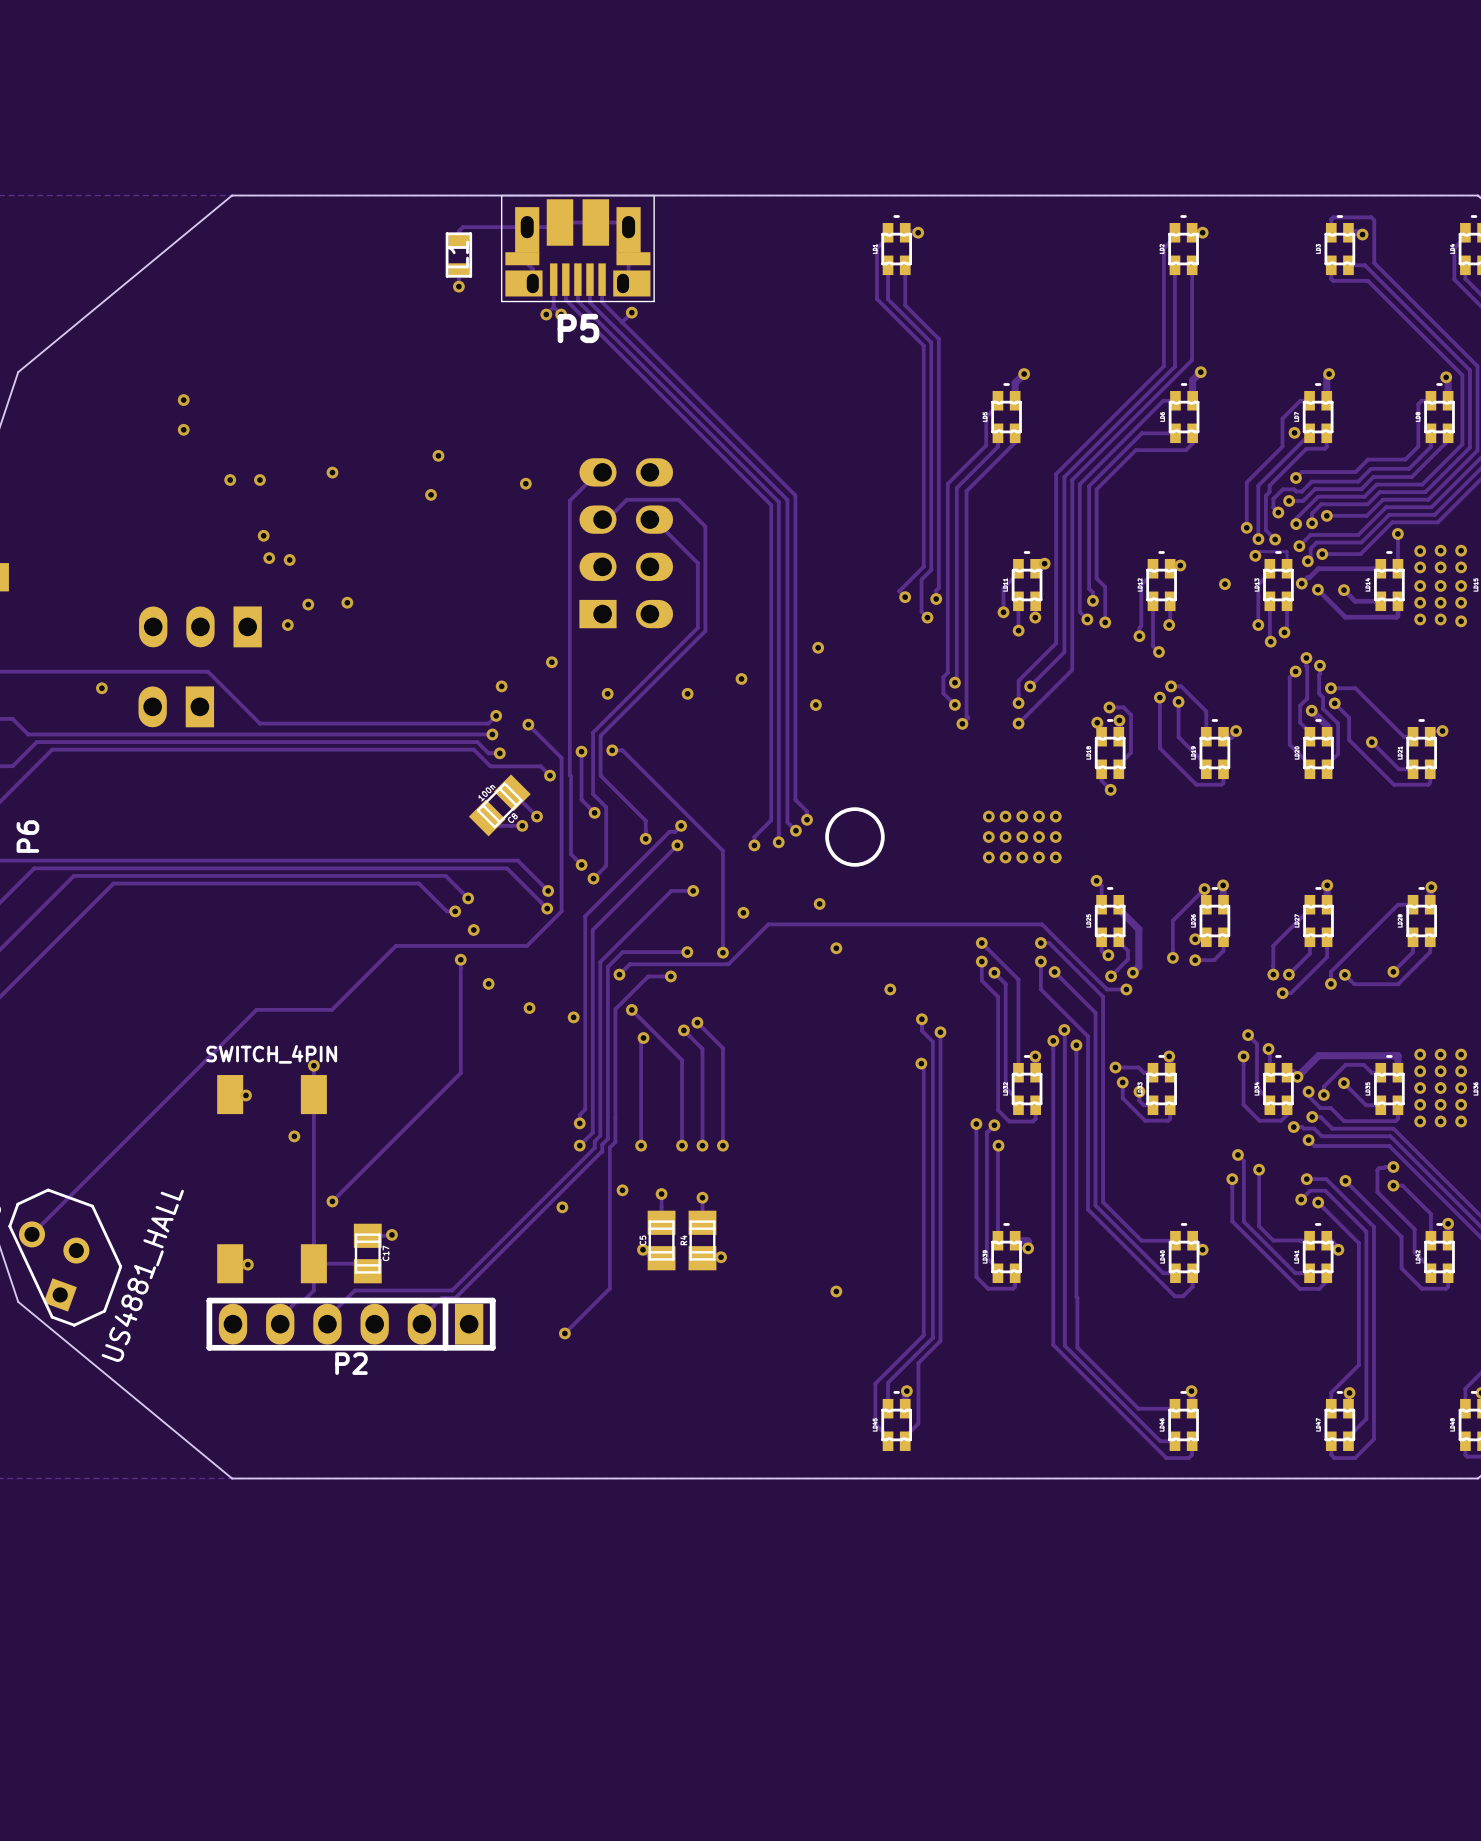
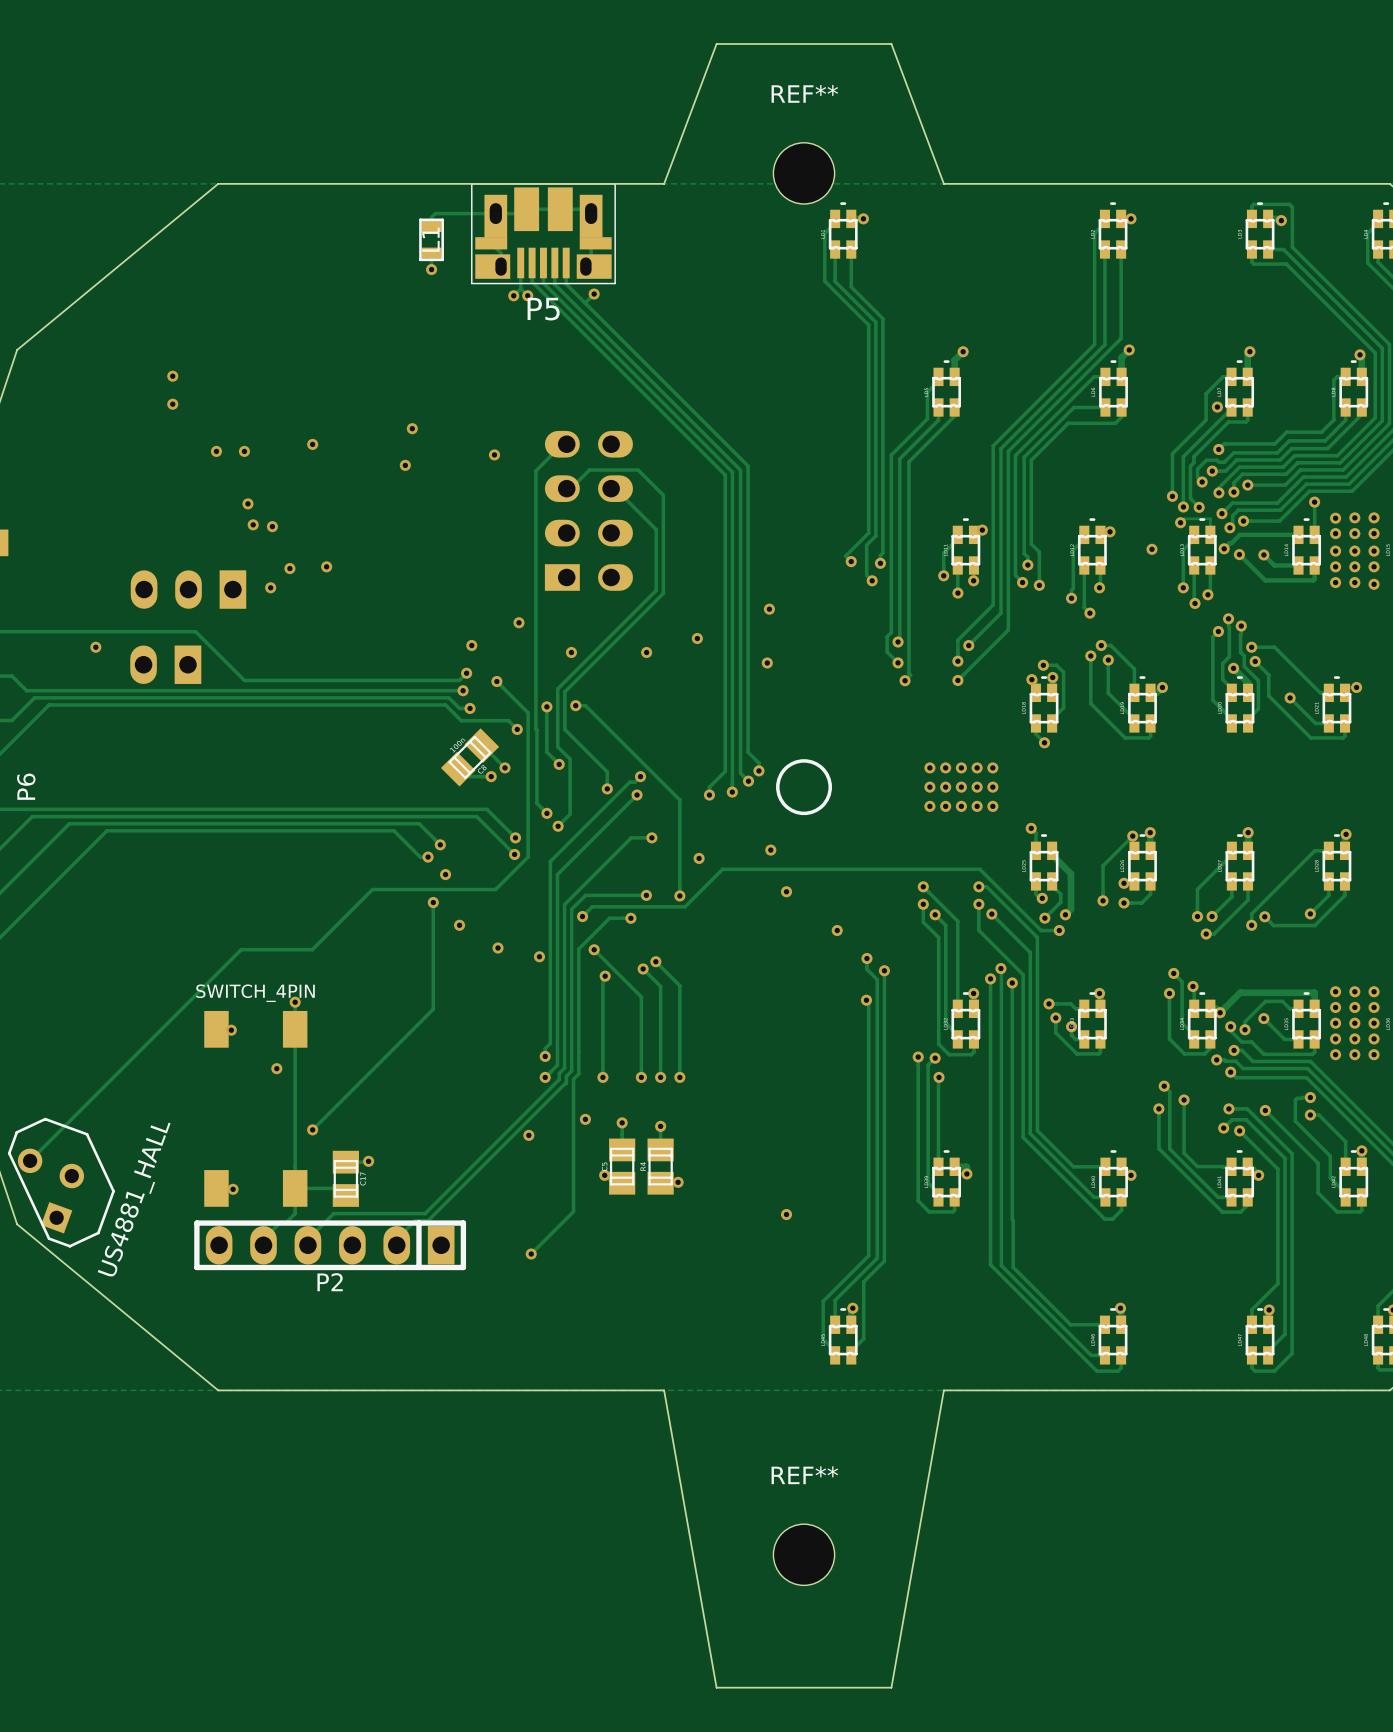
REF**: none -> (804, 173)
board edge: (706, 195) (1003, 195) -> (664, 183) (716, 43) (891, 43) (943, 183)
board edge: (706, 1478) (1003, 1478) -> (664, 1390) (716, 1687) (891, 1687) (943, 1390)
REF**: none -> (804, 1554)

